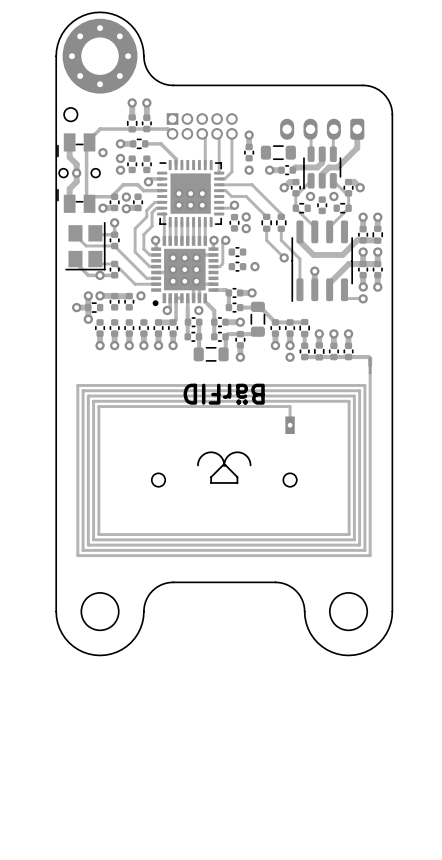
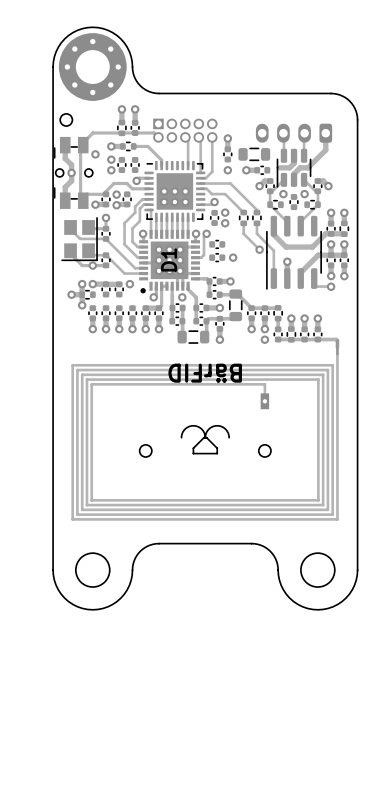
track: (306, 167) (295, 167) (292, 170) -> none
D1 name: none -> D1 (169, 259)

